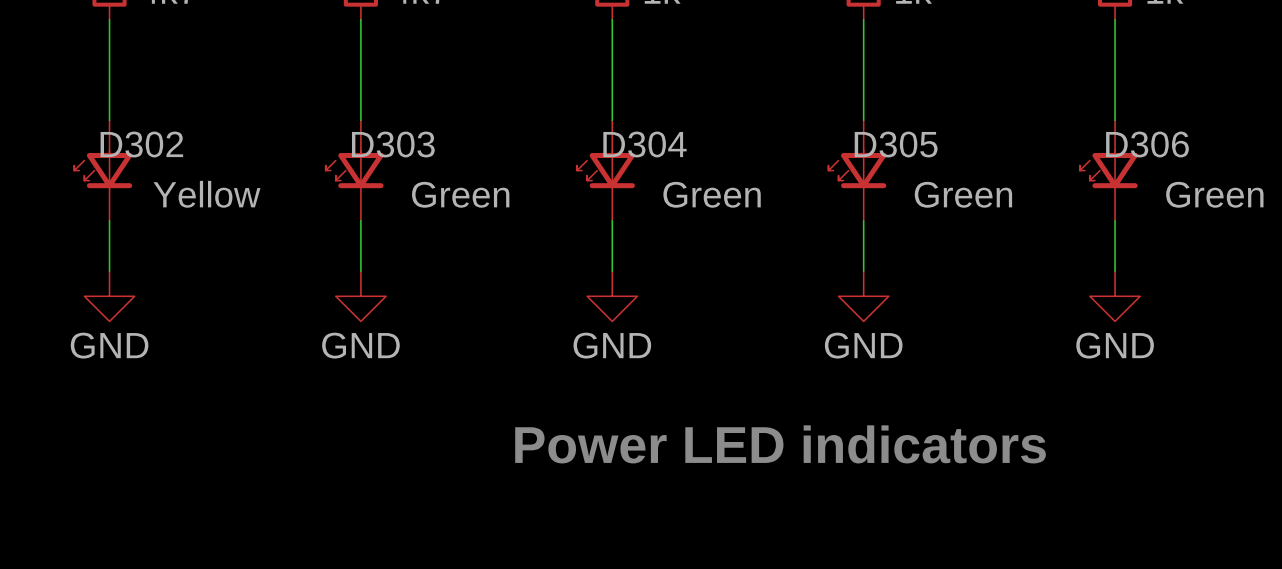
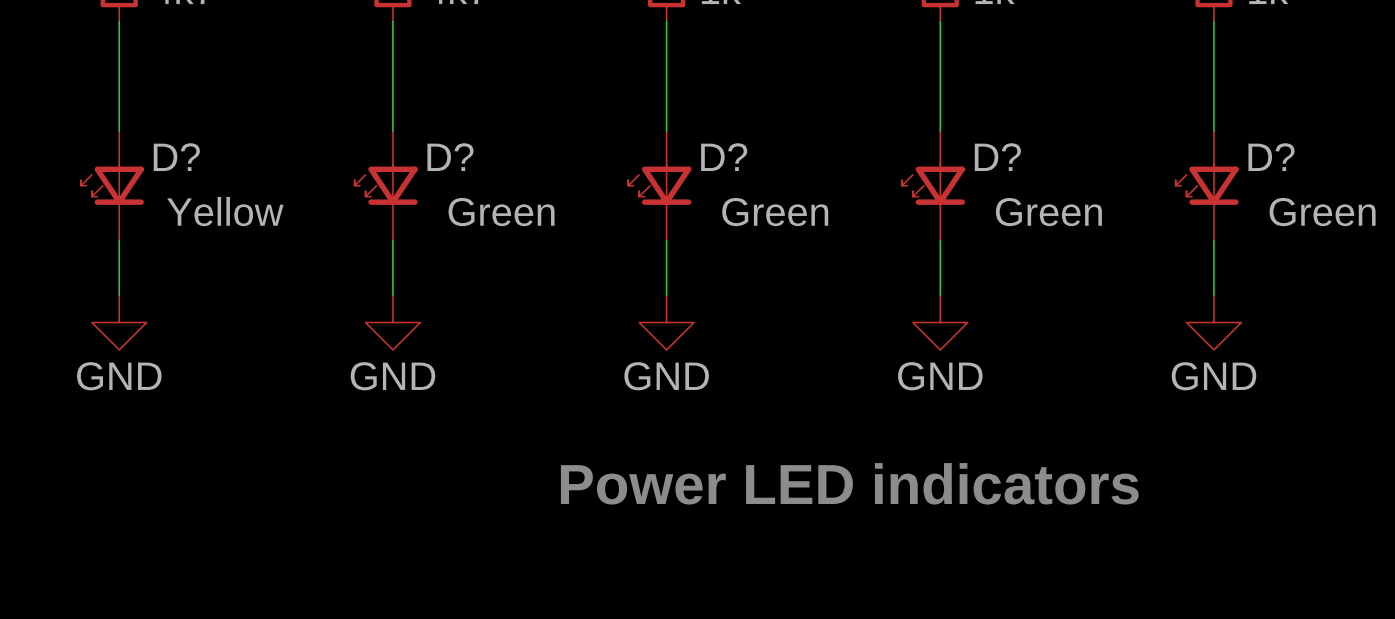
D302 name: D302 (141, 144) -> D? (176, 157)
D303 name: D303 (393, 144) -> D? (450, 157)
D304 name: D304 (644, 144) -> D? (724, 157)
D305 name: D305 (896, 144) -> D? (997, 157)
D306 name: D306 (1147, 144) -> D? (1271, 157)

